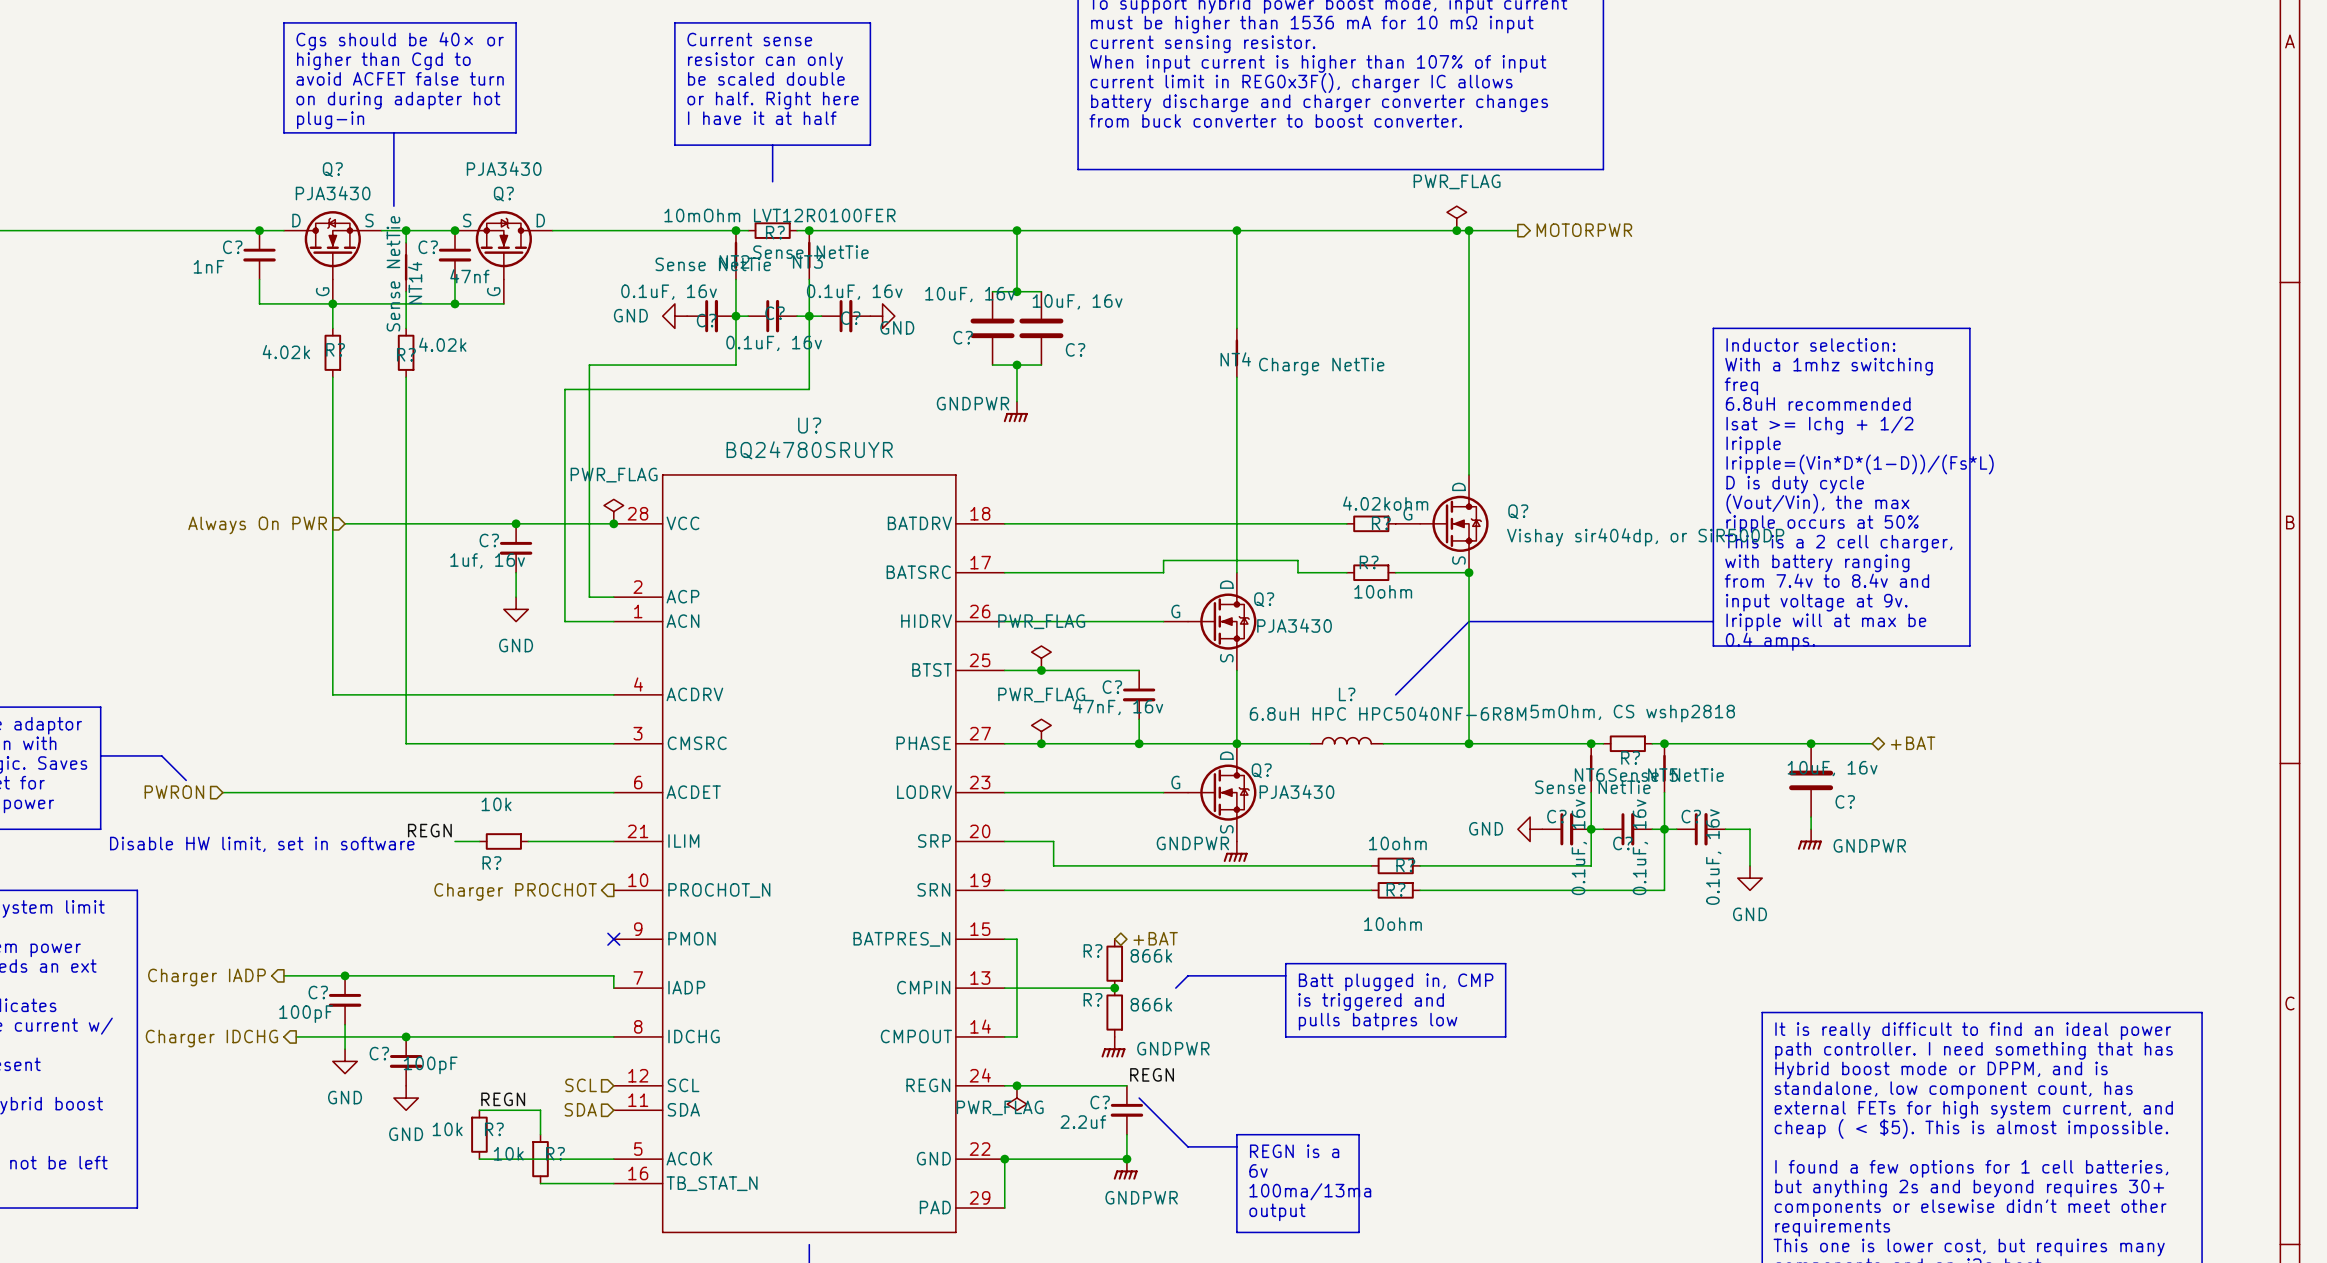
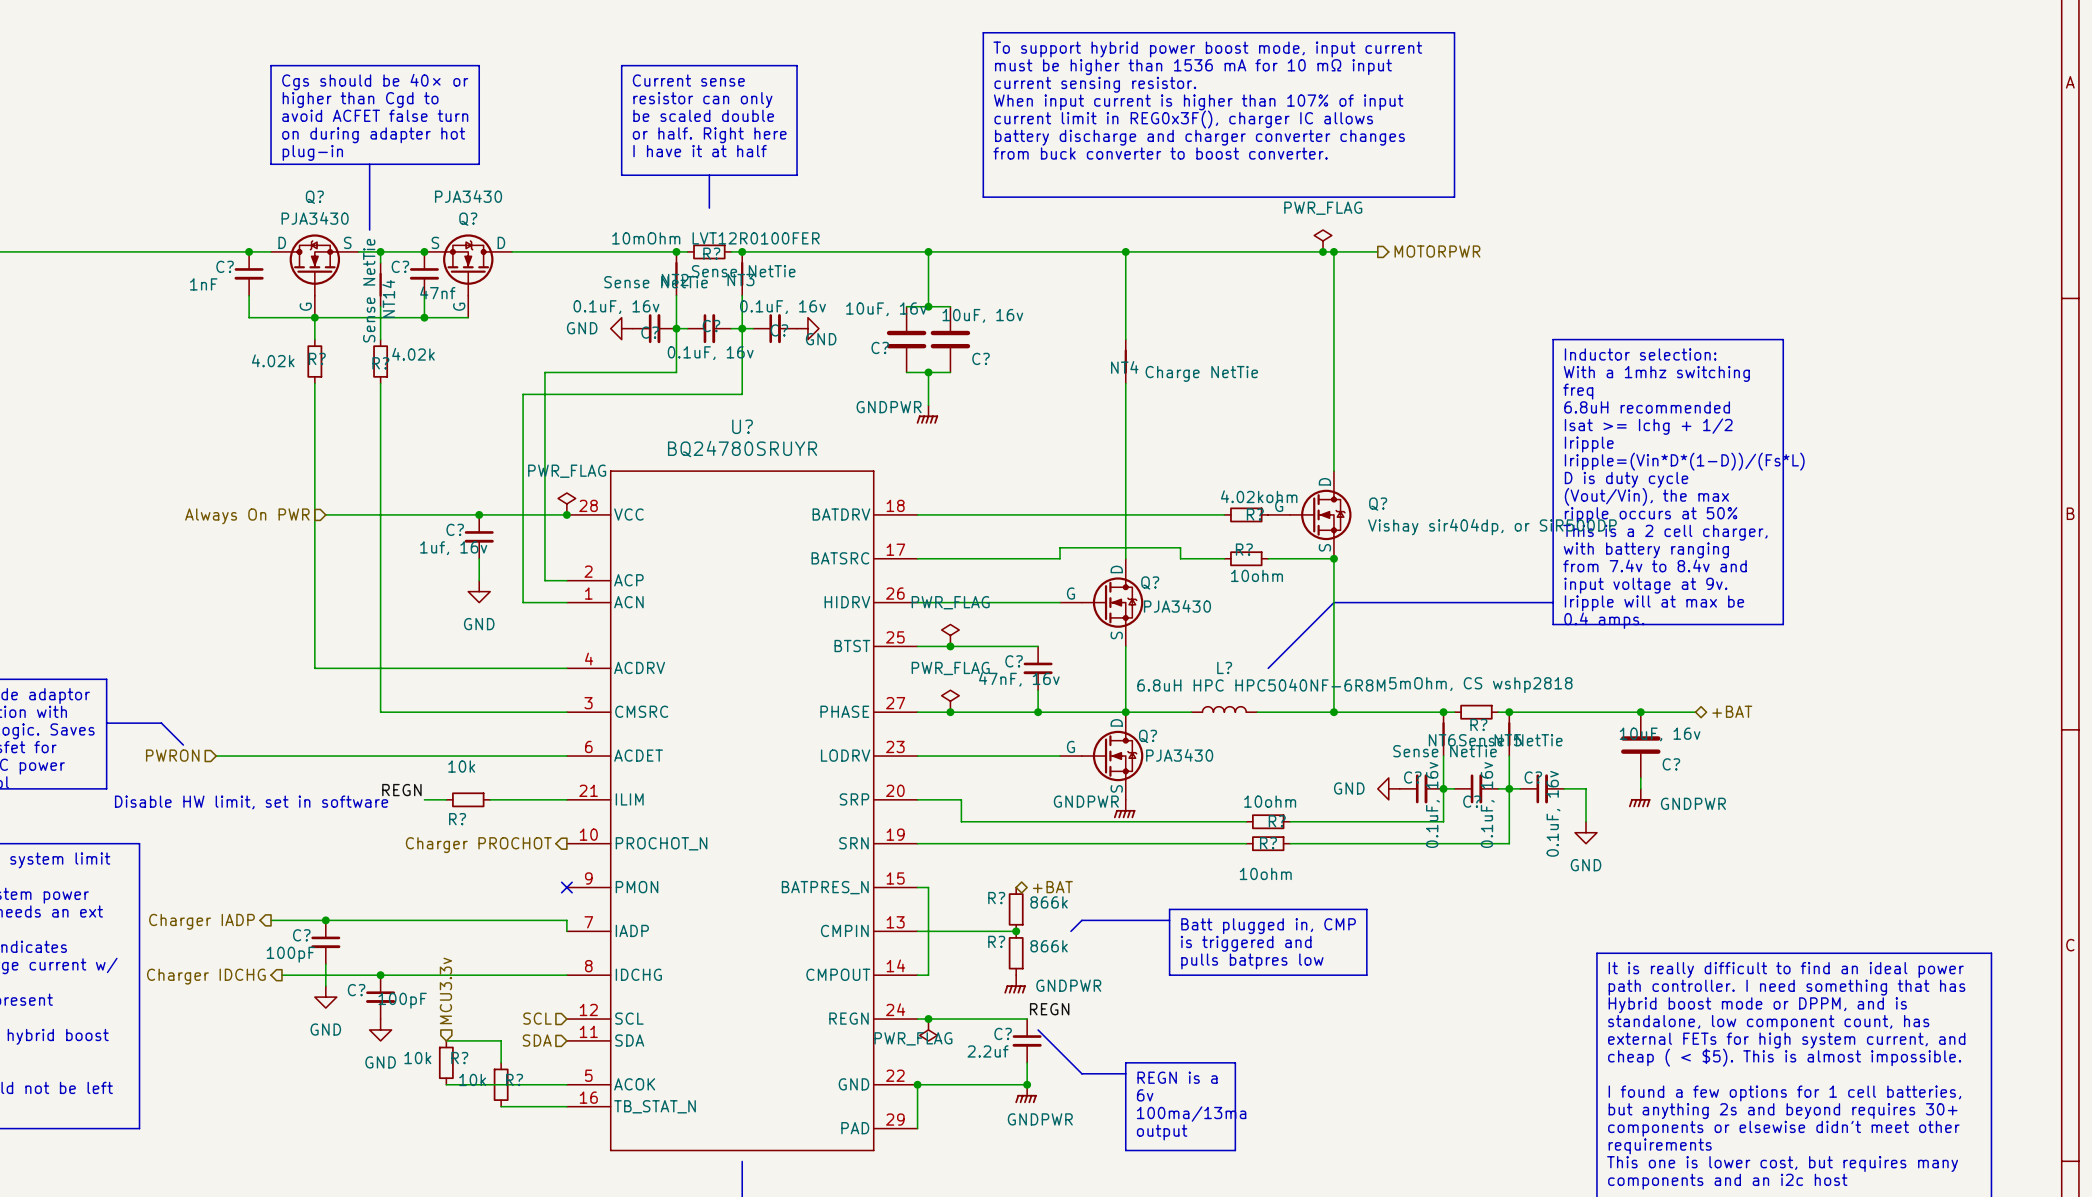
hierarchical label: none -> MCU3.3v (445, 990)
label: REGN (503, 1099) -> none

